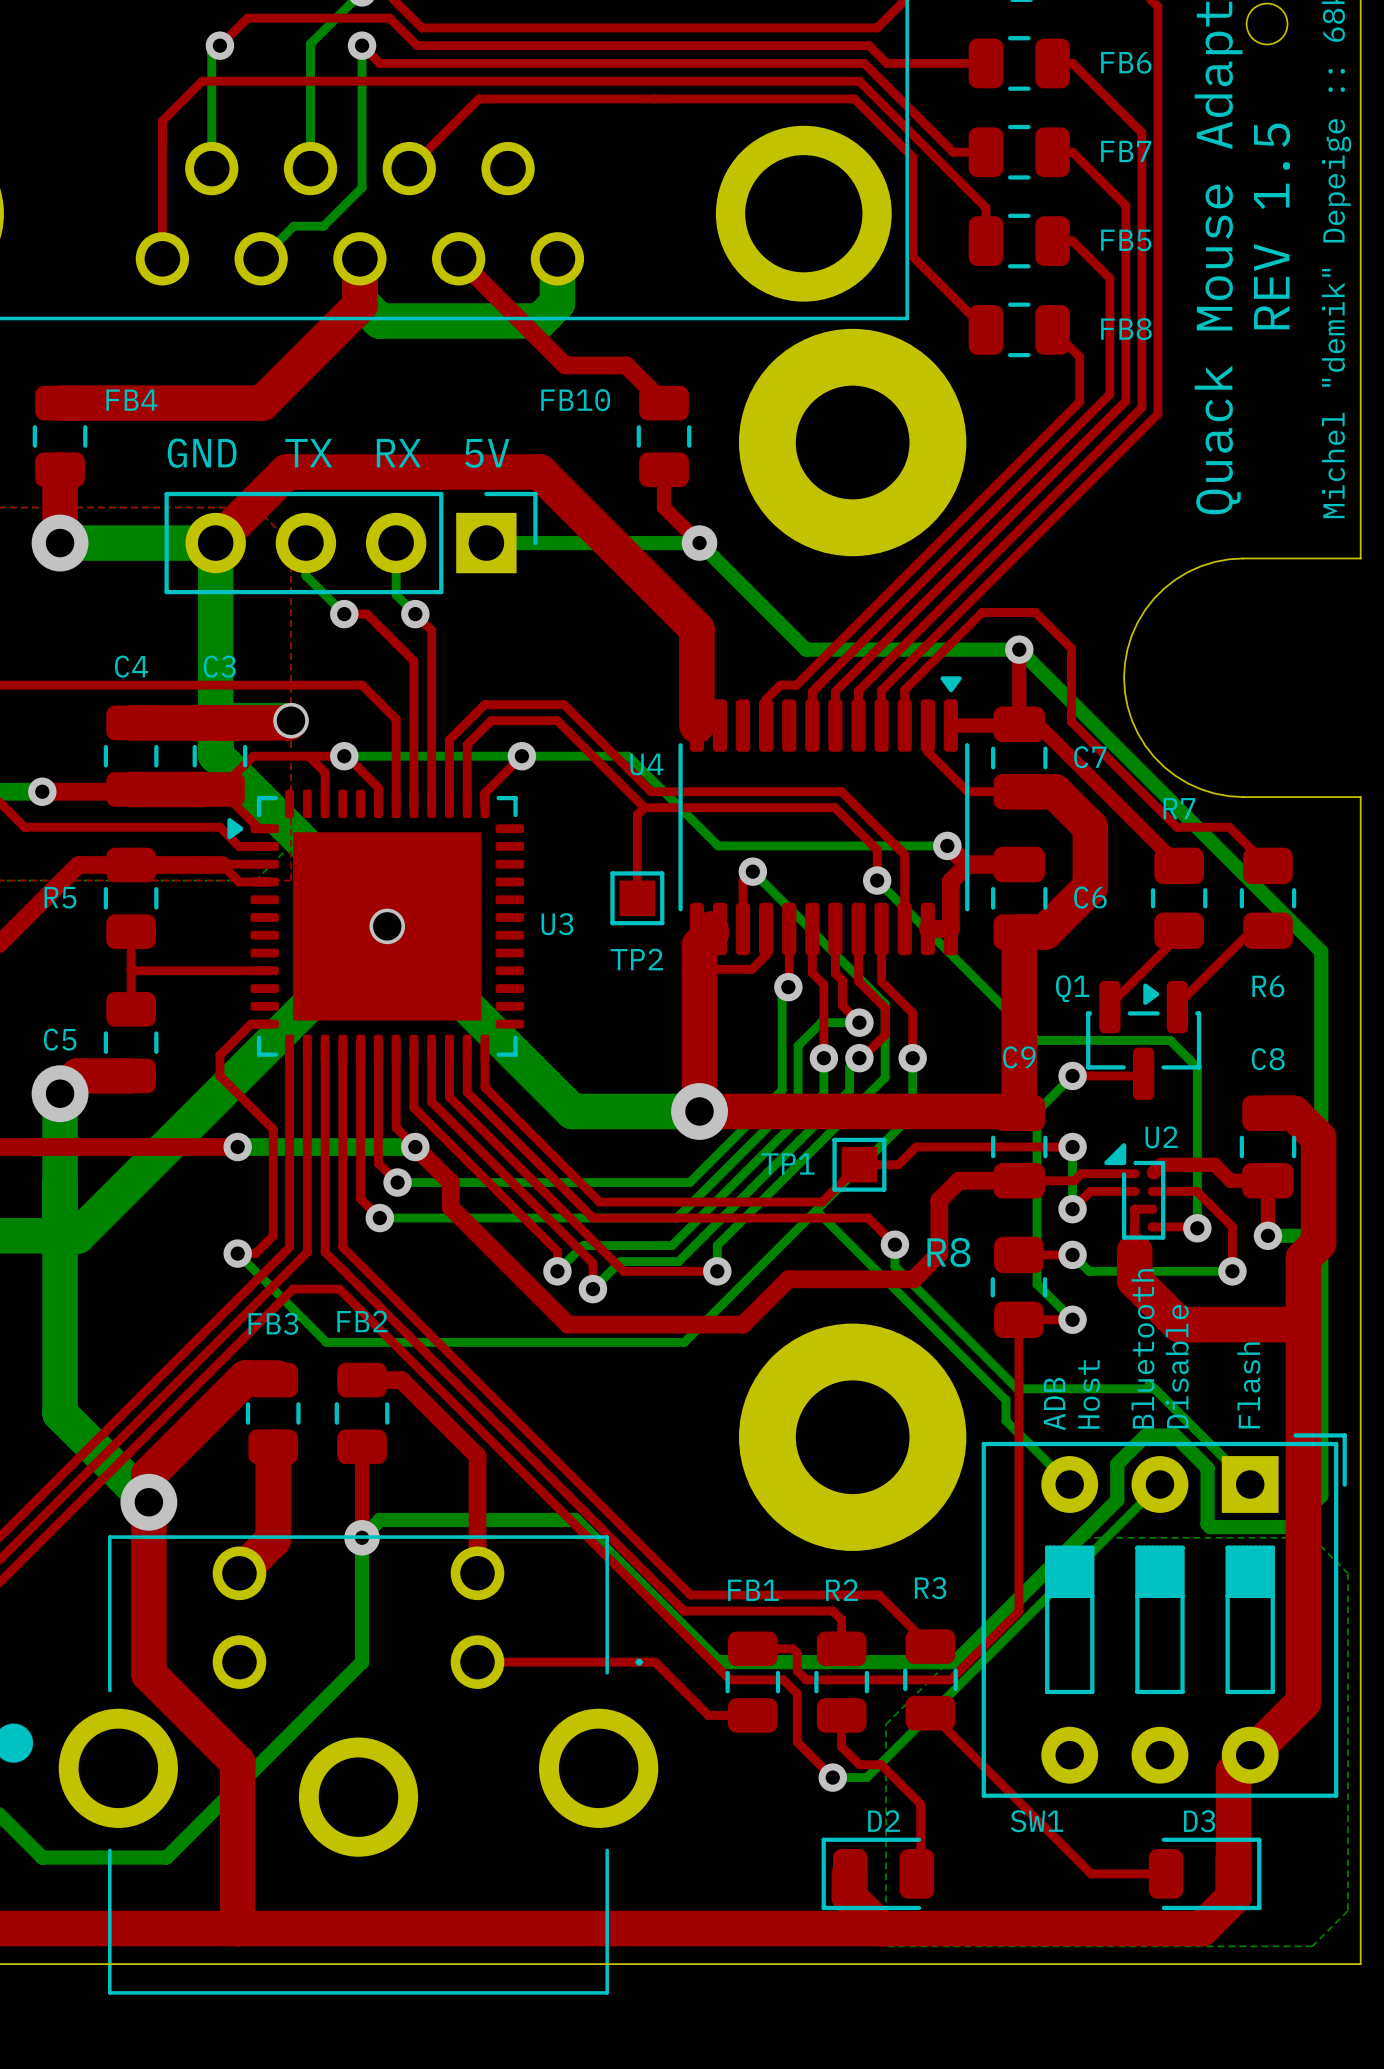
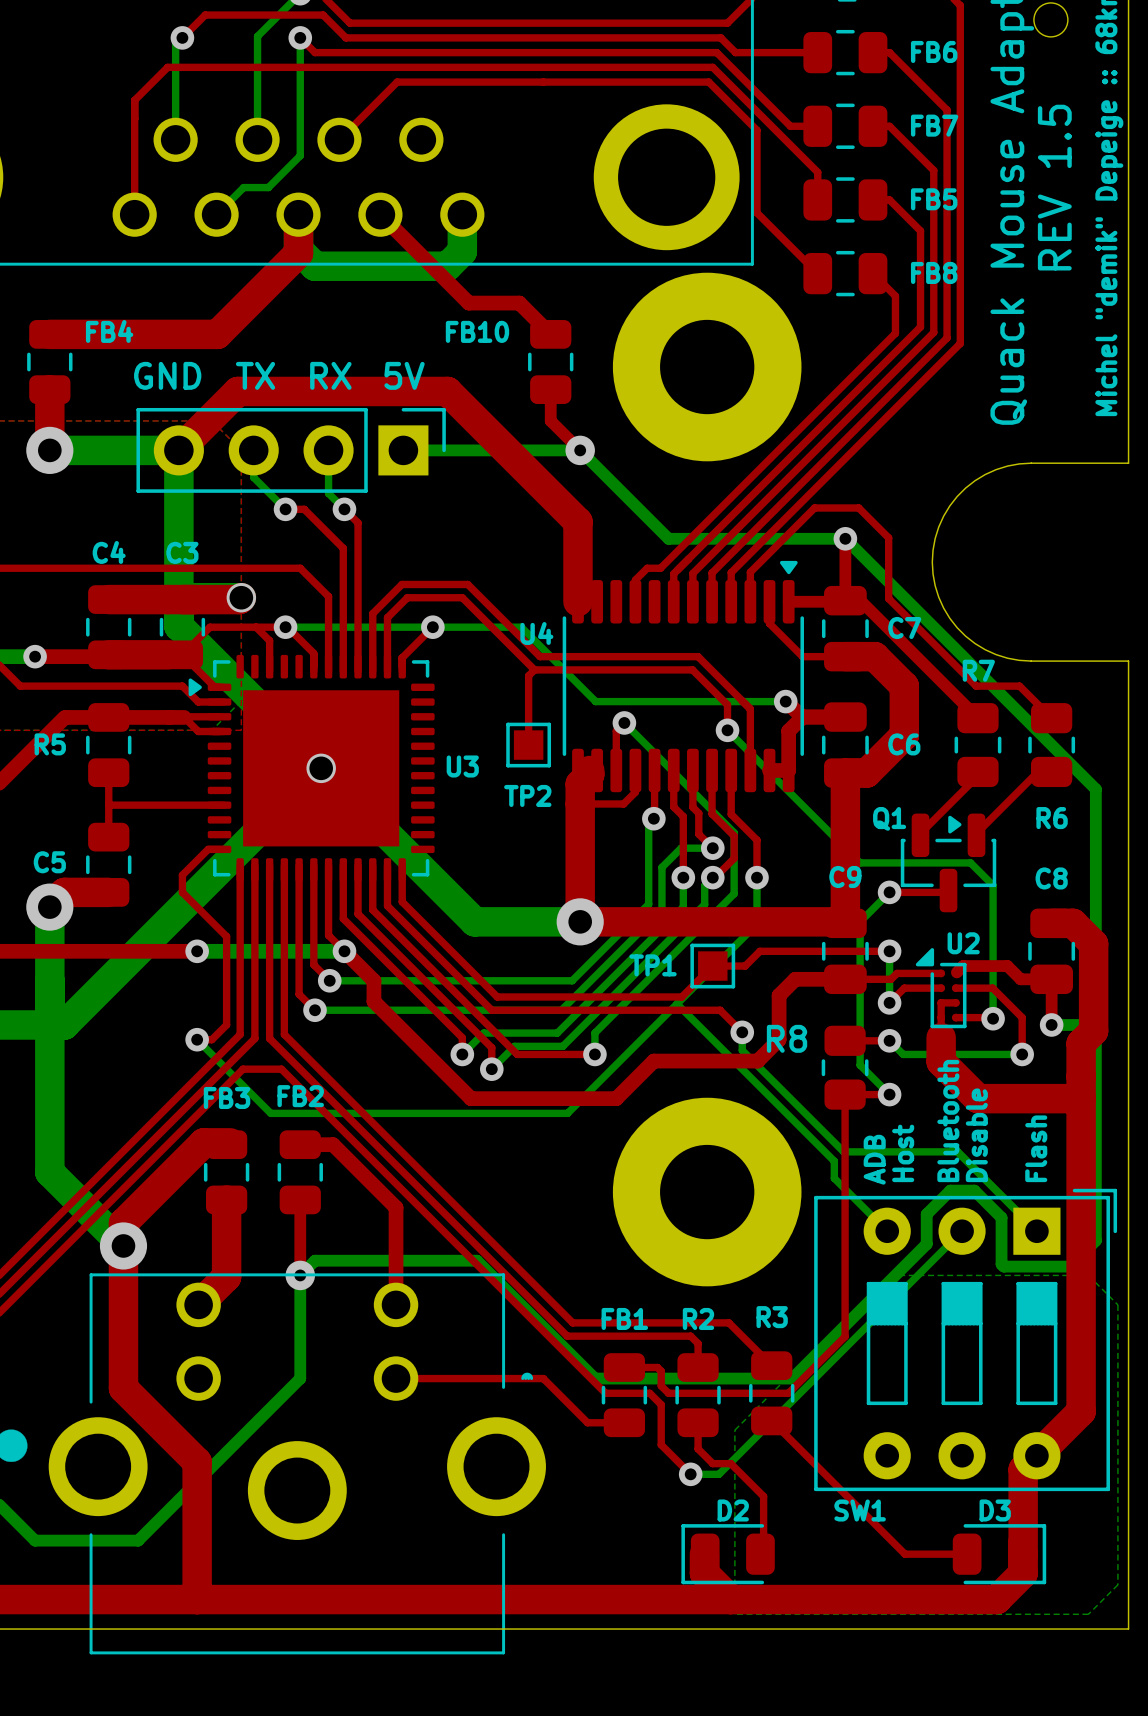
part footprint: [58, 1535, 659, 1995] -> [48, 1273, 546, 1655]

